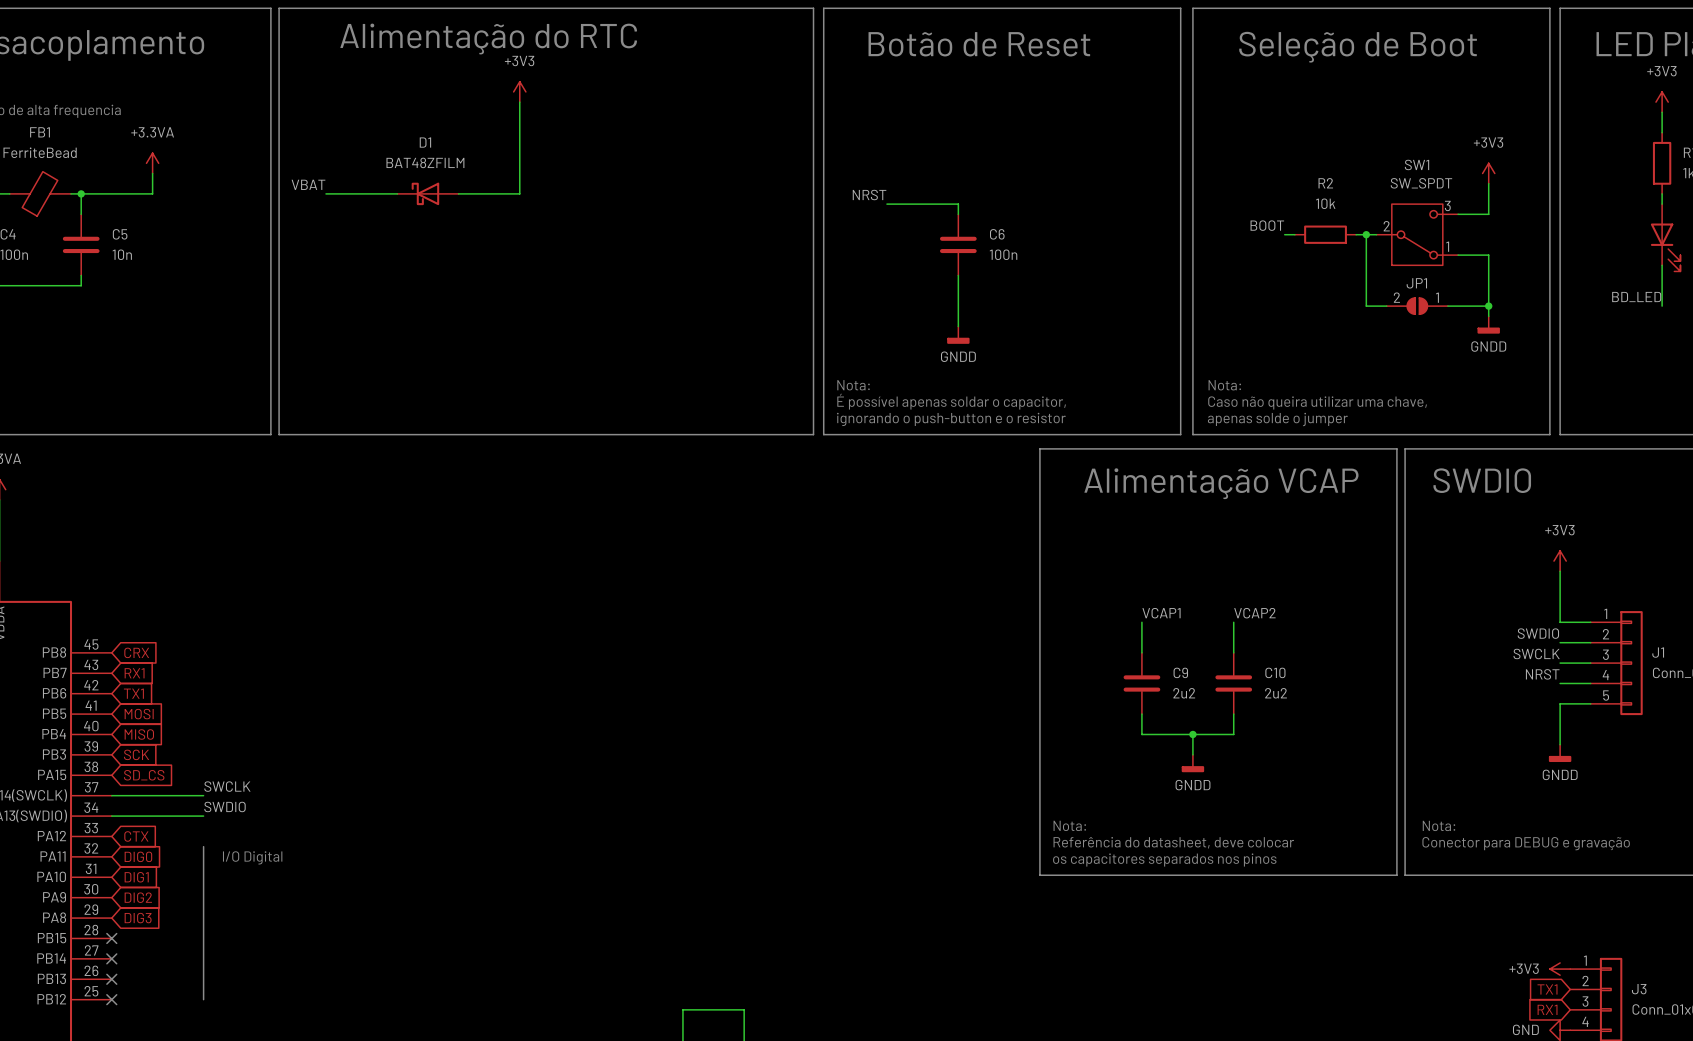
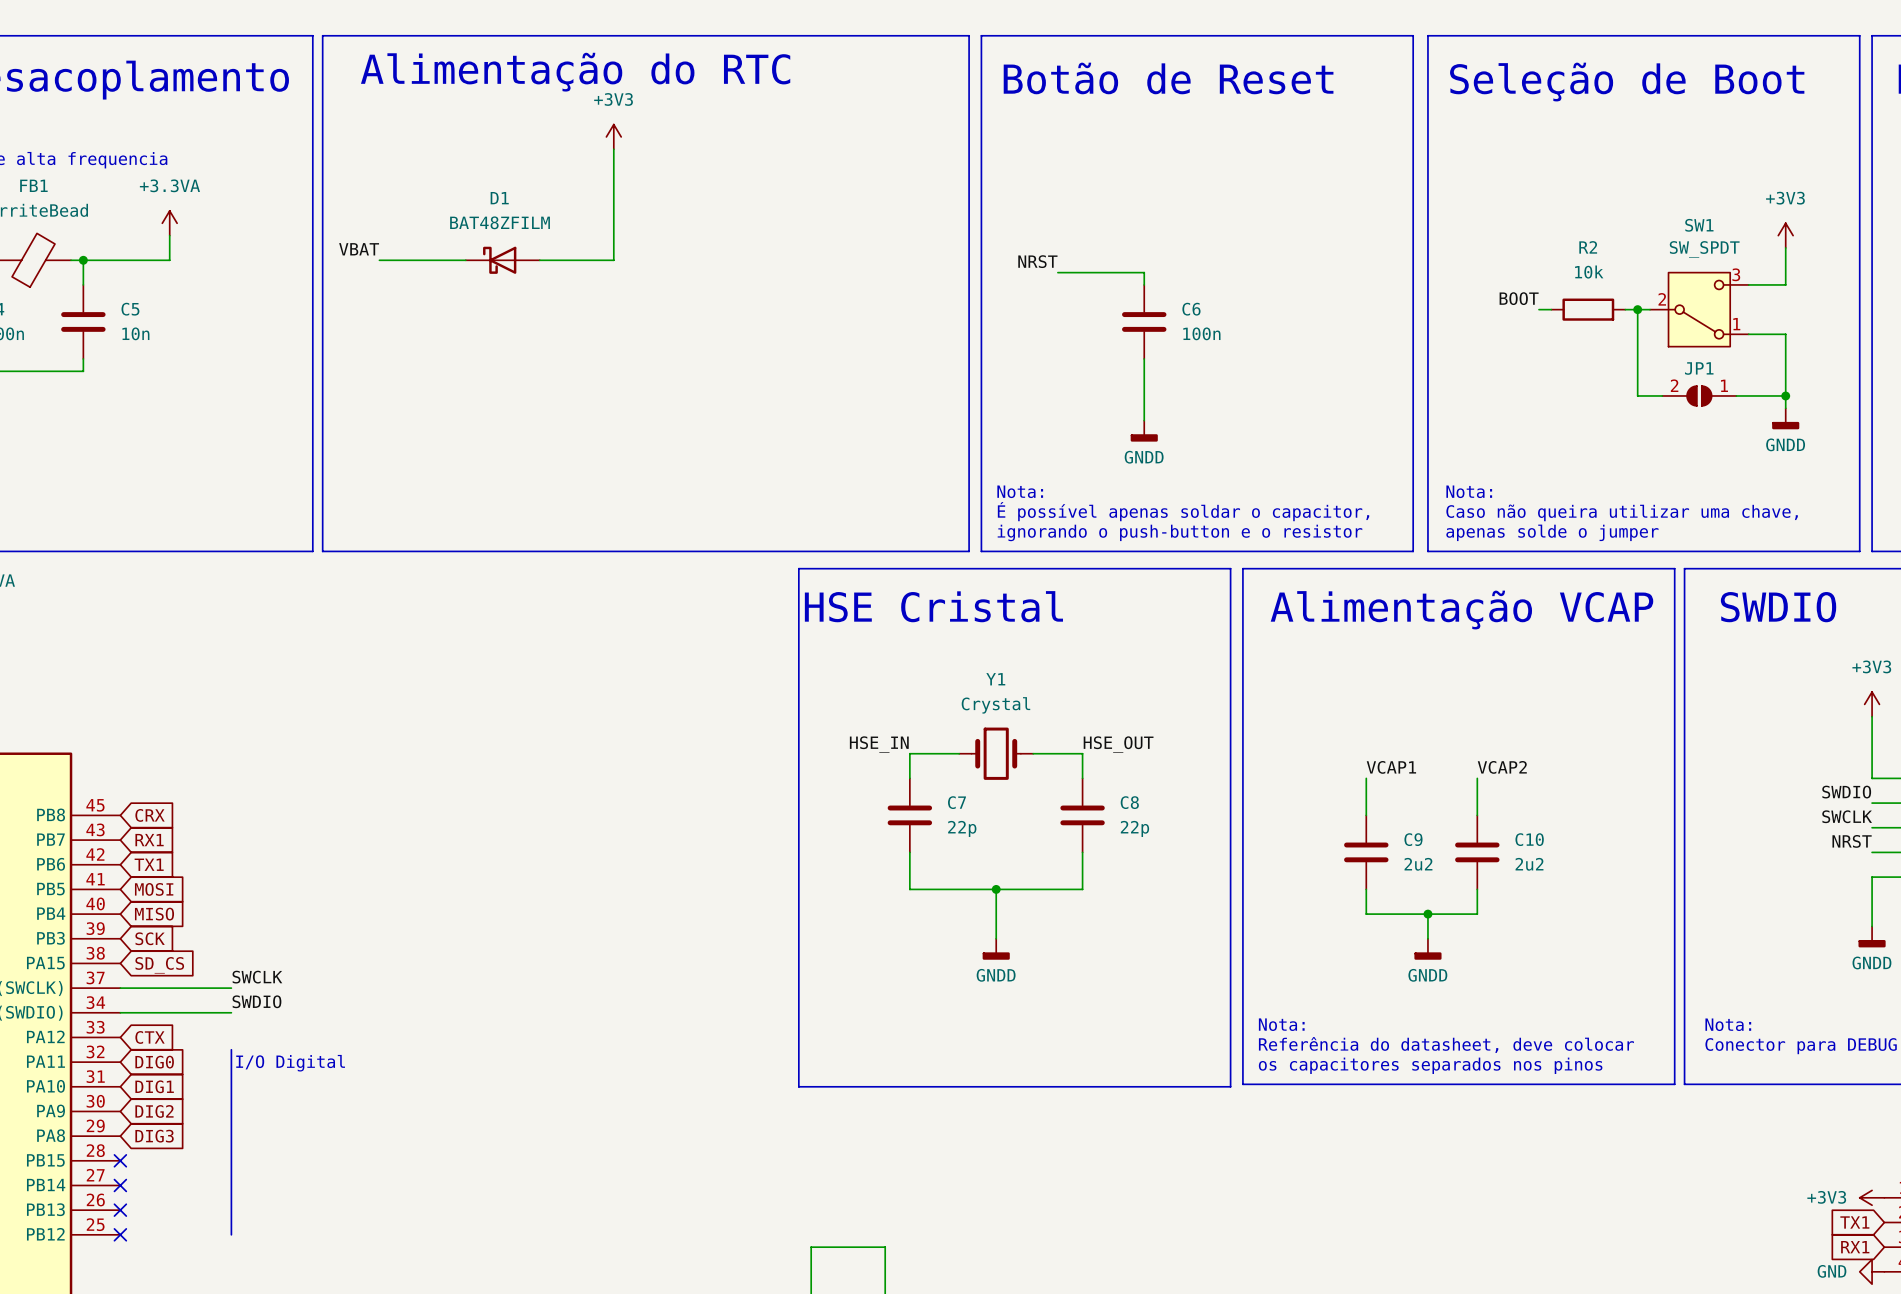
line: none -> (798, 568) (1230, 568) (1230, 1086) (798, 1086) (798, 568)
text: none -> HSE Cristal (933, 606)
label: none -> HSE_IN (879, 744)
label: none -> HSE_OUT (1118, 744)
wire: none -> (959, 753) (909, 753) (909, 778)
Y1: none -> Crystal (996, 753)
wire: none -> (1033, 753) (1082, 753) (1082, 778)
C7: none -> 22p (909, 815)
C8: none -> 22p (1082, 815)
wire: none -> (909, 852) (909, 889) (1082, 889) (1082, 852)
wire: none -> (996, 889) (996, 938)
junction: none -> (996, 889)
power symbol: none -> GNDD (996, 949)

